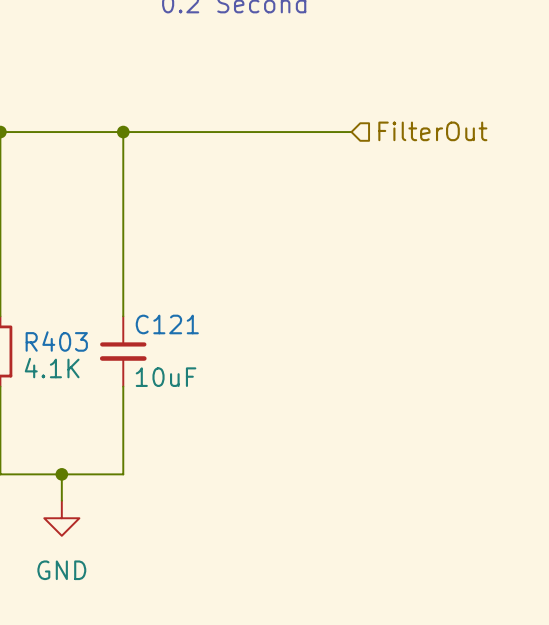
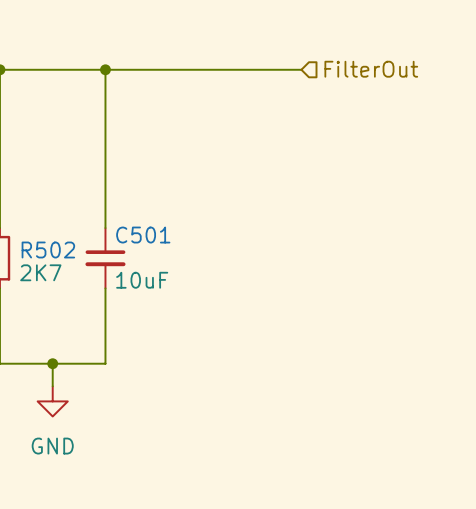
C121 name: C121 (167, 324) -> C501 (143, 235)
R403 name: R403 (56, 341) -> R502 (48, 250)
R403 value: 4.1K (52, 368) -> 2K7 (40, 272)

